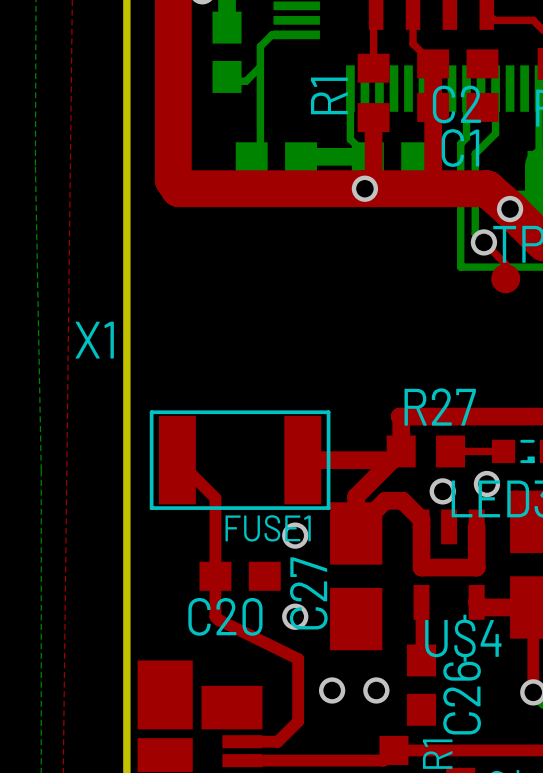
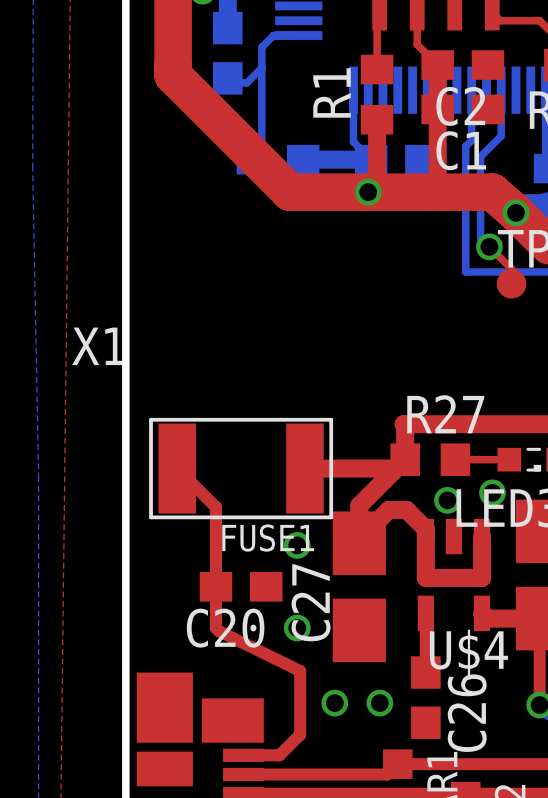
top track: (173, 74) (173, 180) (179, 188) (287, 188) -> (173, 75) (289, 192)

